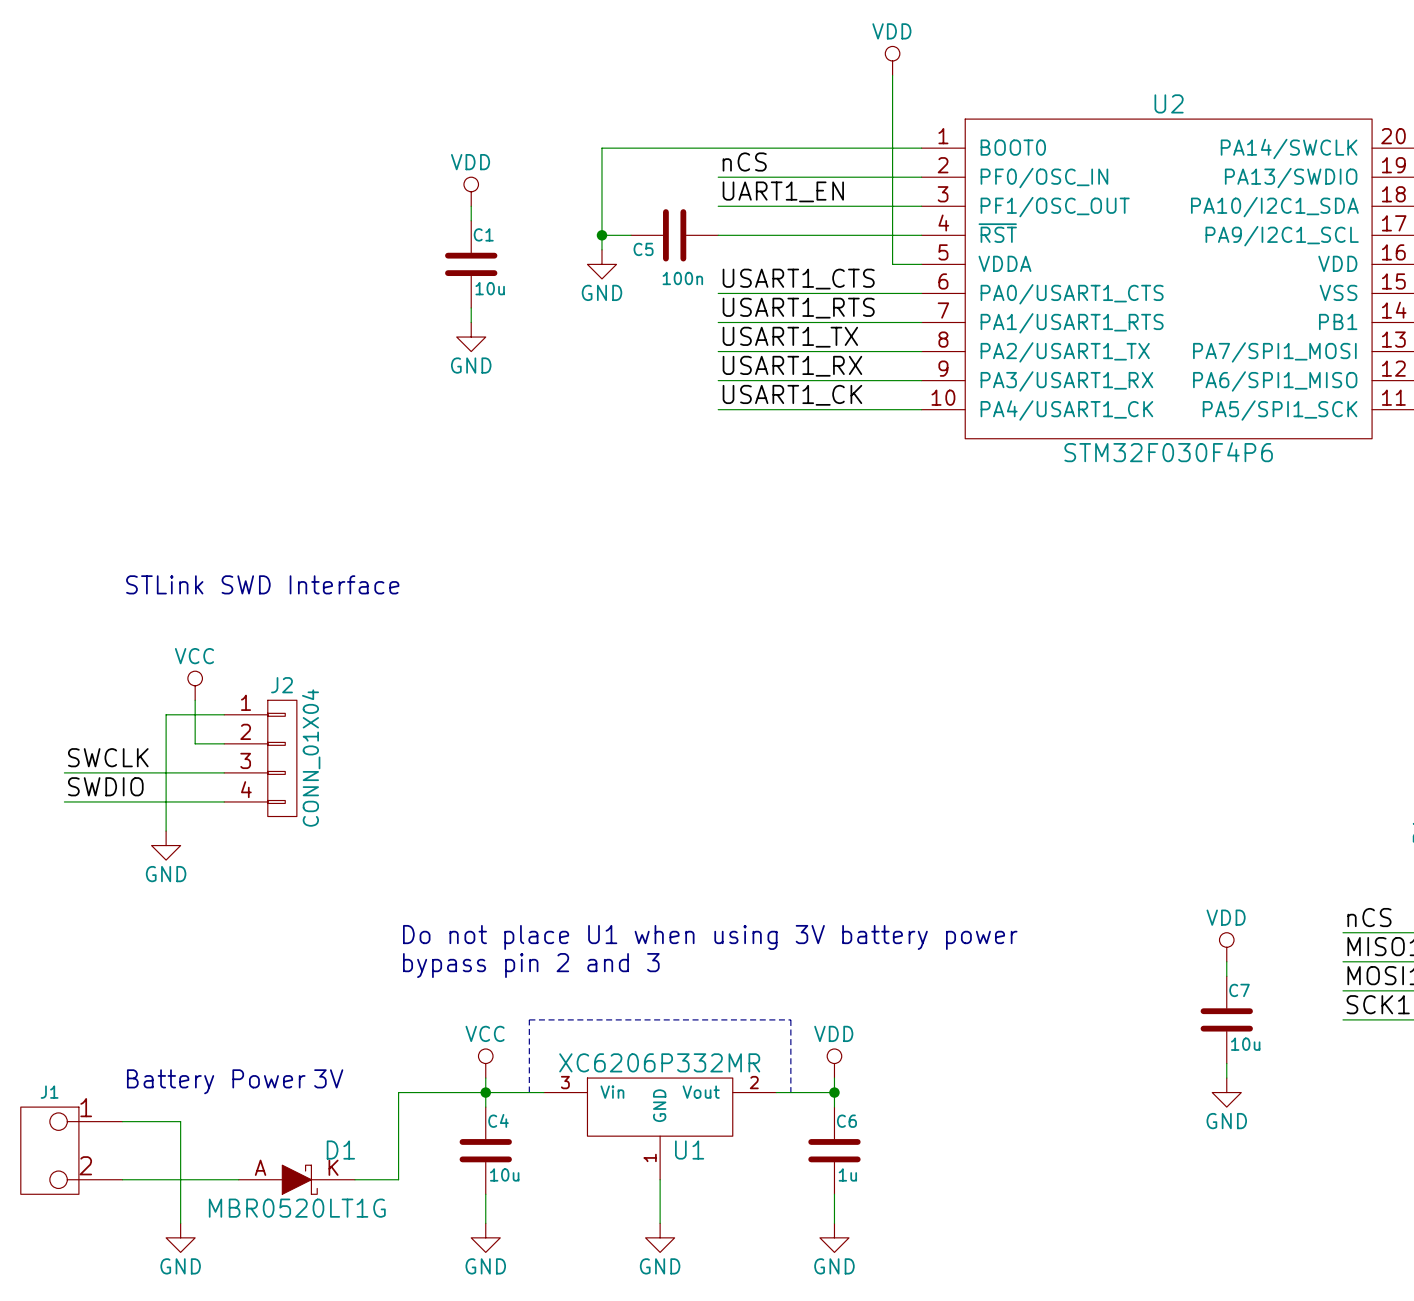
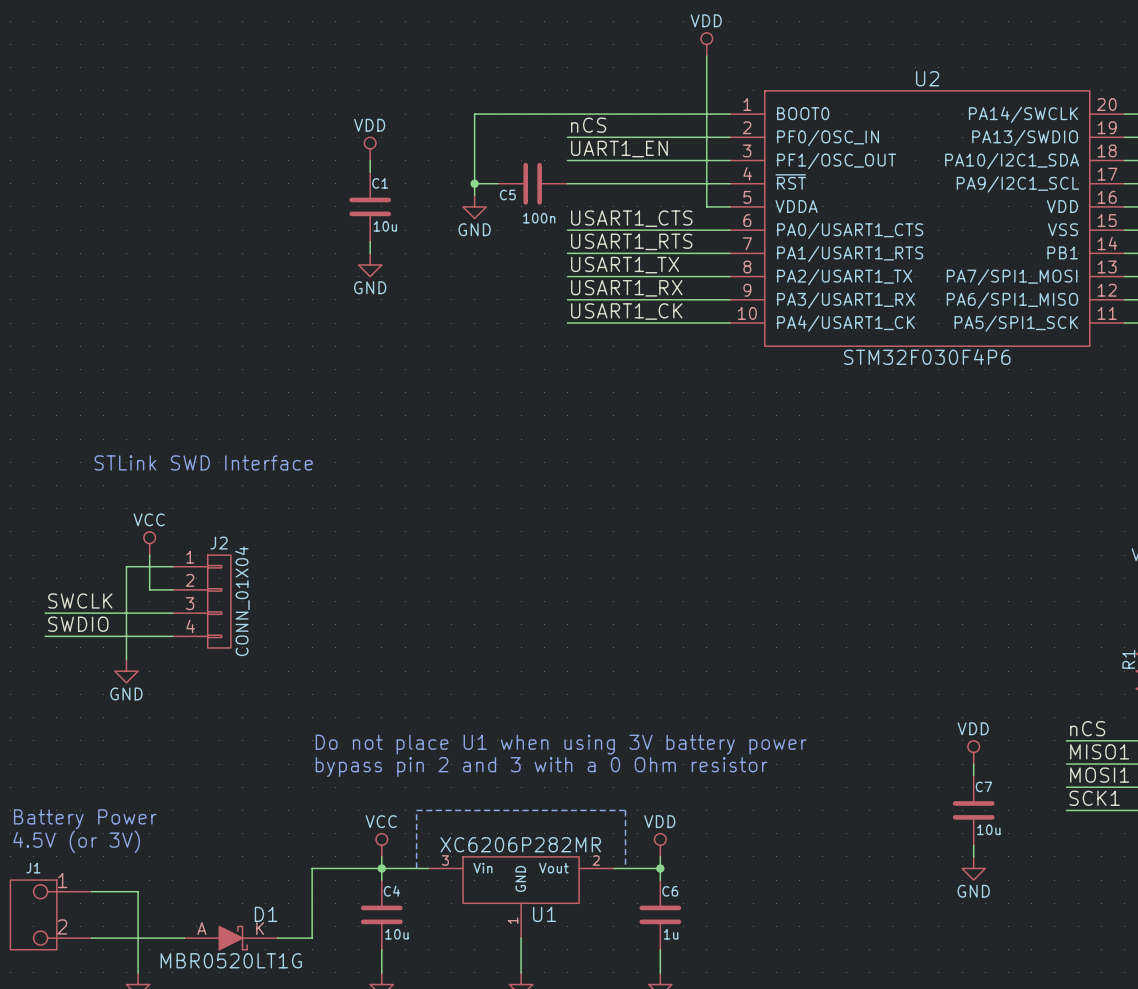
text: bypass pin 2 and 3 (531, 965) -> bypass pin 2 and 3 with a 0 Ohm resistor (541, 767)
text: none -> 4.5V (or 3V) (76, 841)
U1 value: XC6206P332MR (659, 1062) -> XC6206P282MR (520, 844)
text: 3V (328, 1078) -> none
text position: Battery Power (216, 1081) -> Battery Power (85, 819)

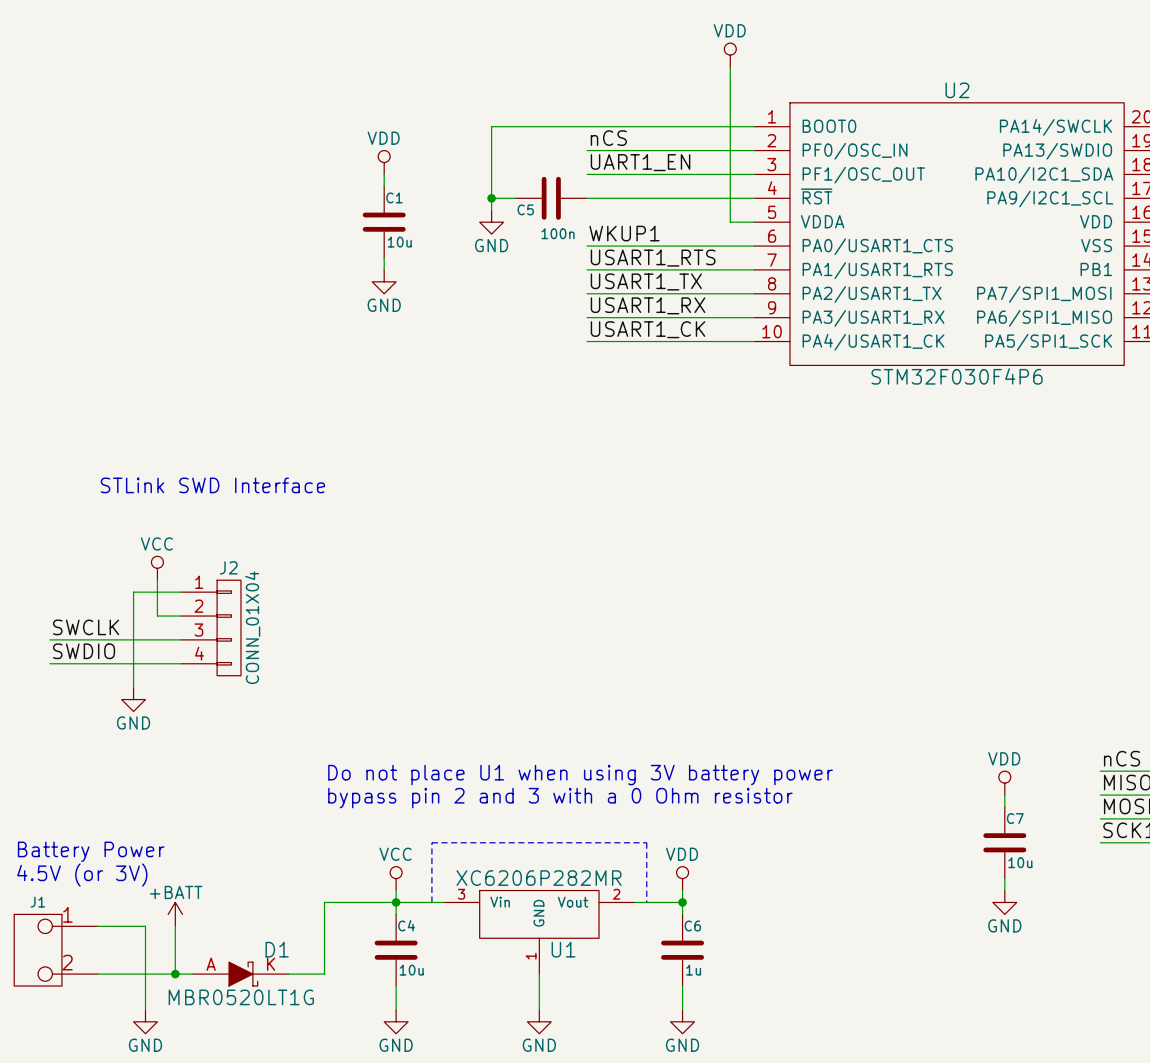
label: USART1_CTS (631, 218) -> WKUP1 (624, 233)
power symbol: none -> +BATT (175, 914)
wire: none -> (175, 926) (175, 974)
junction: none -> (175, 974)

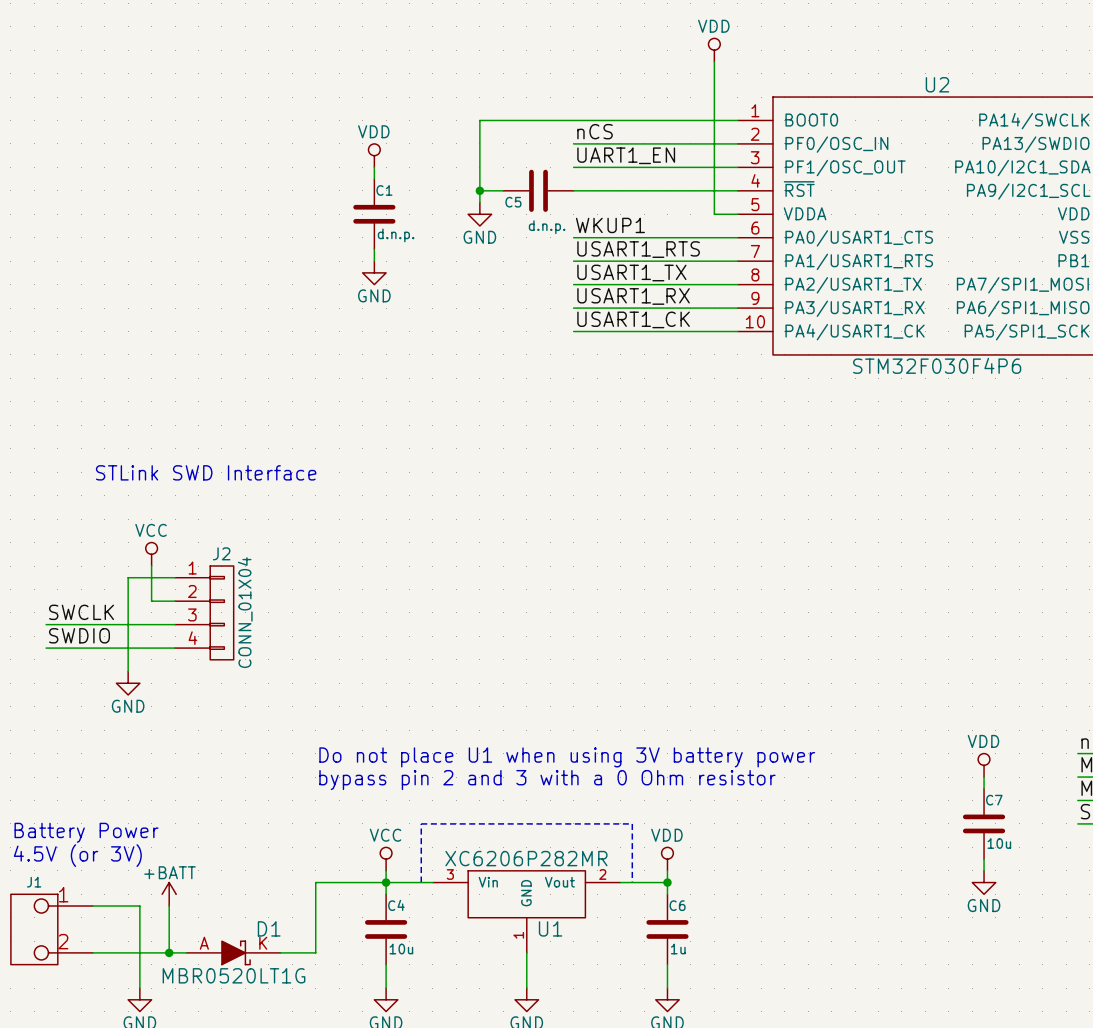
C5 value: 100n (558, 233) -> d.n.p. (547, 227)
C1 value: 10u (399, 242) -> d.n.p. (396, 235)

